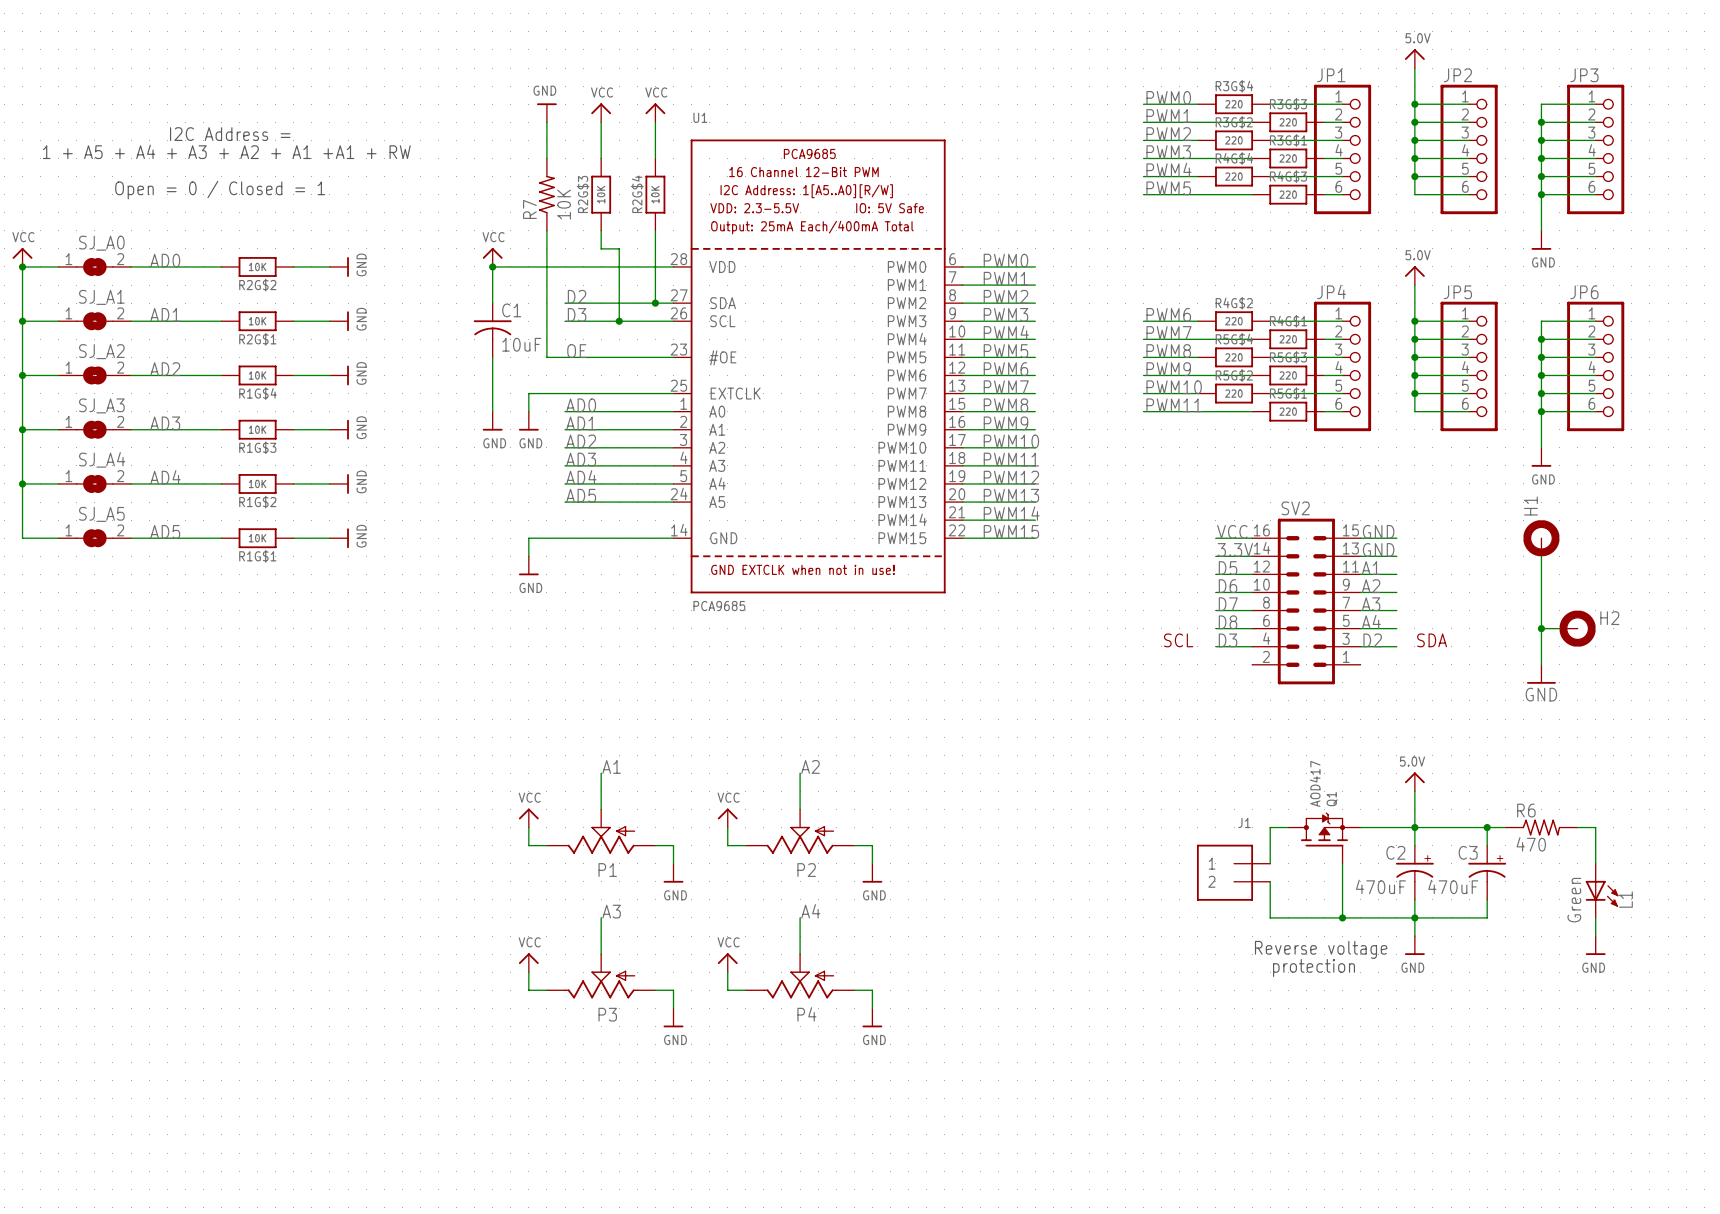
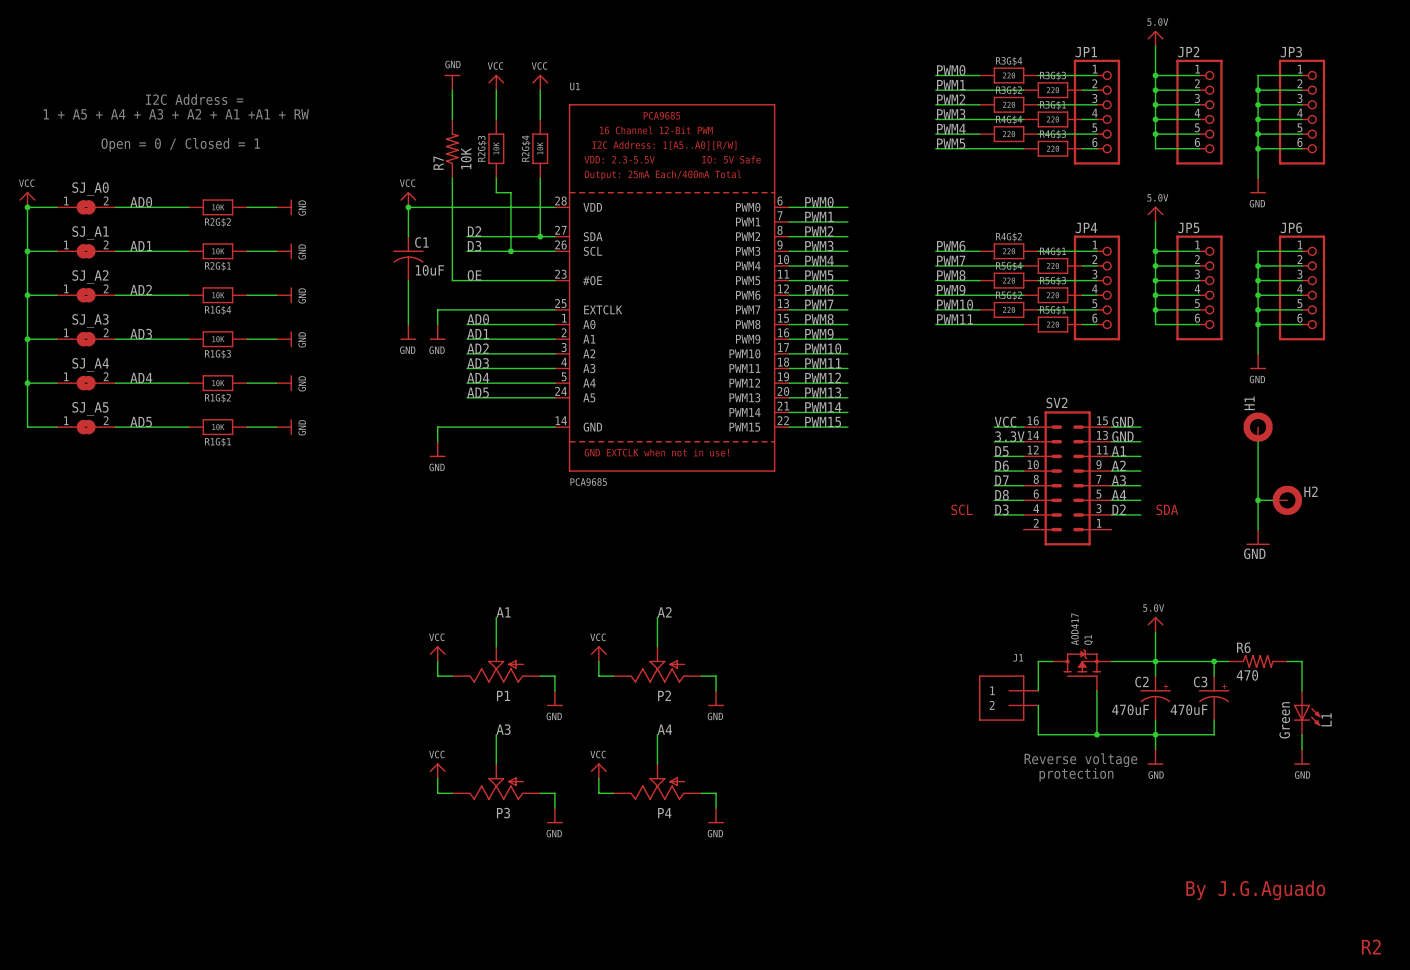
text: none -> By J.G.Aguado (1255, 890)
text: none -> R2 (1371, 947)

